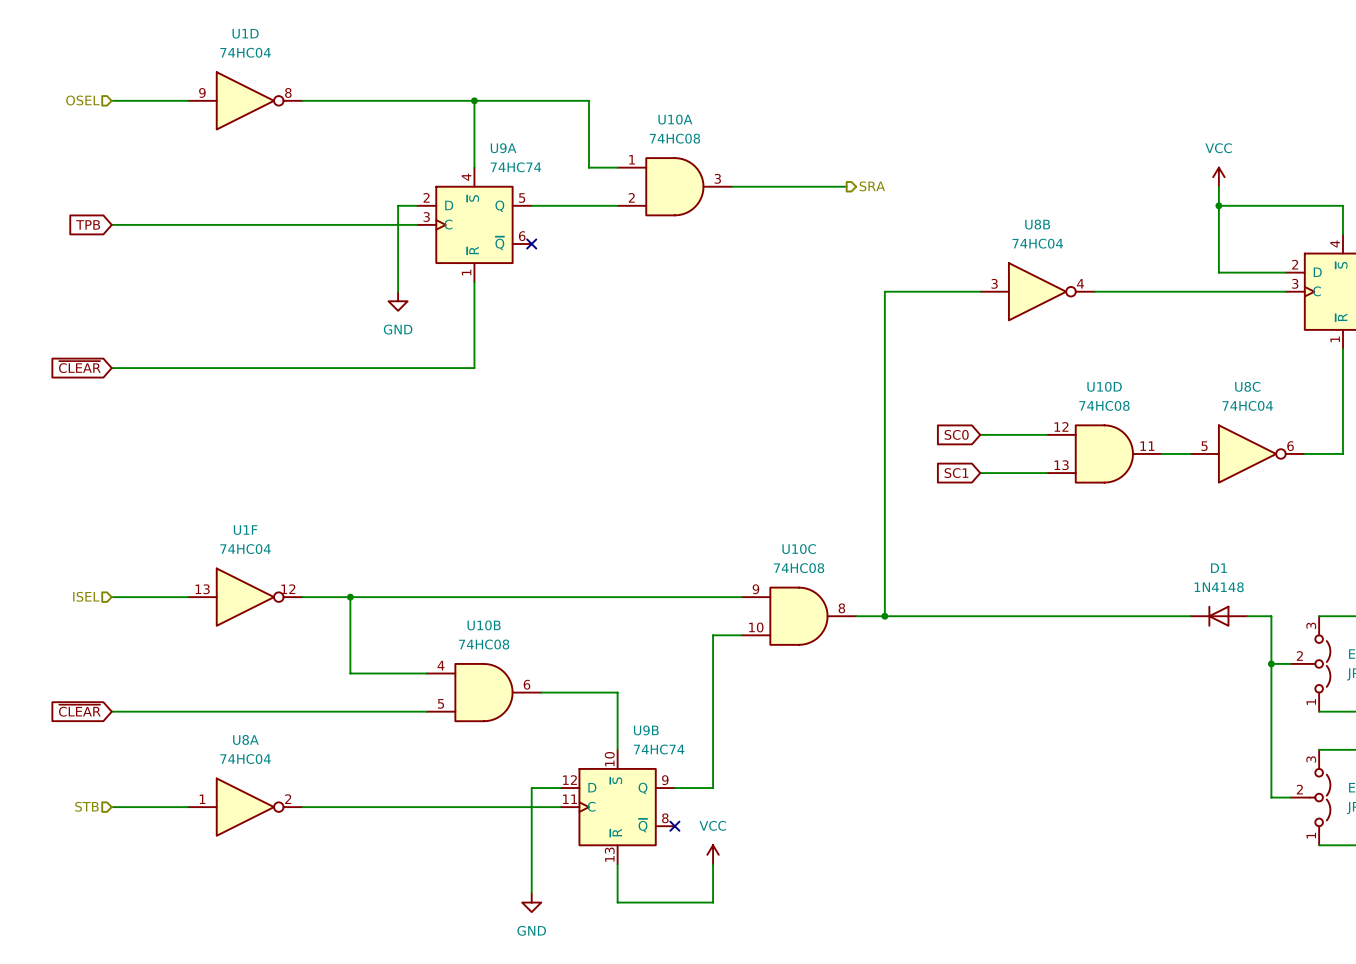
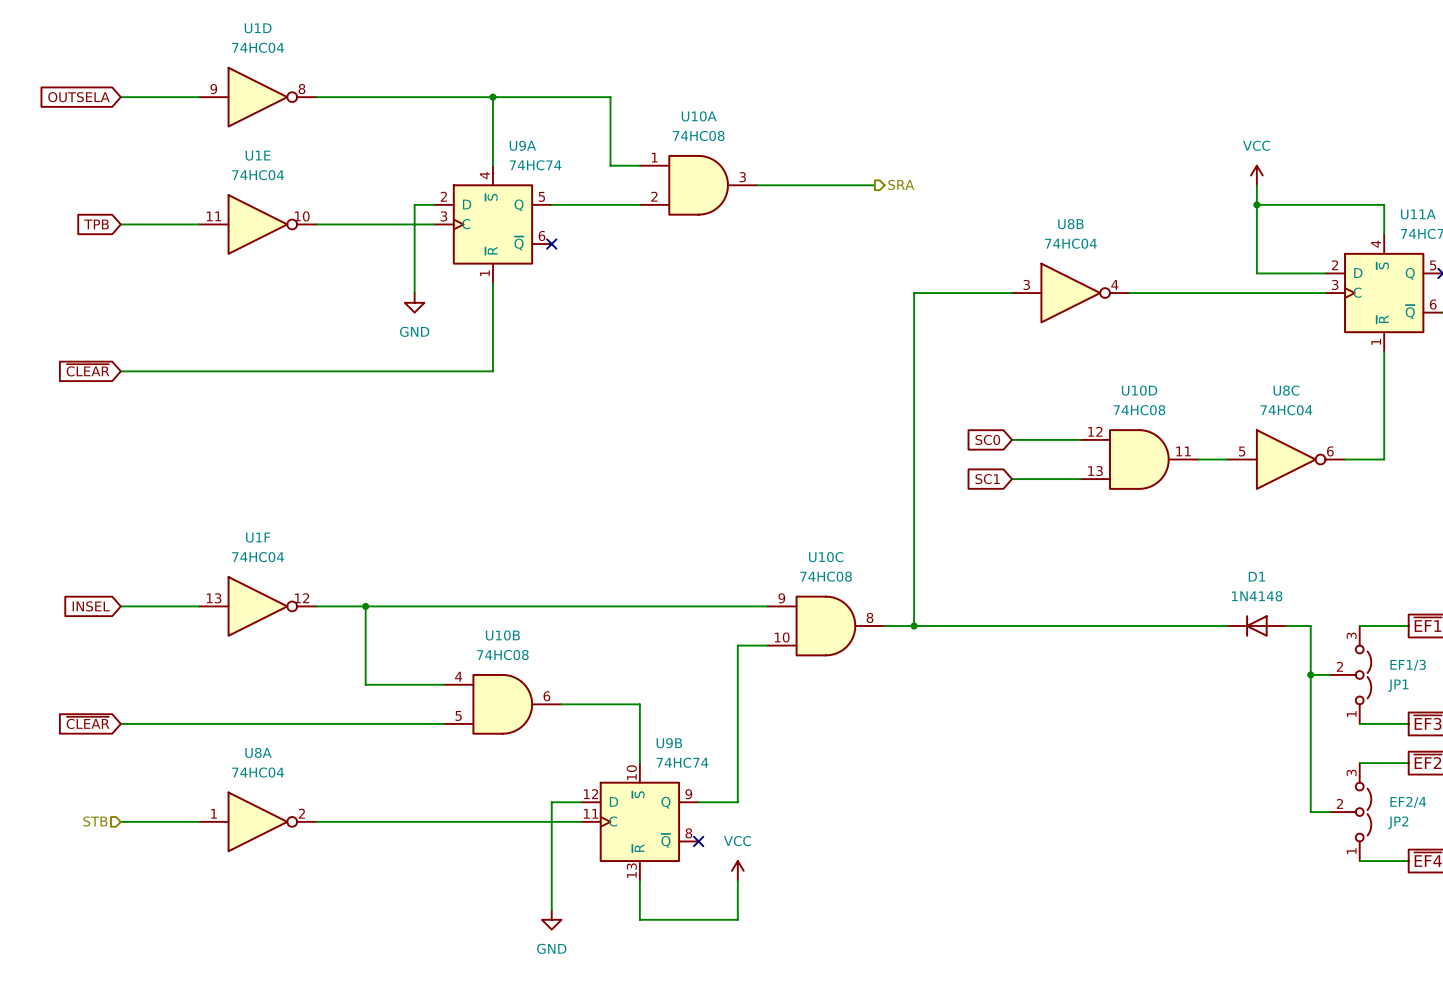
global label: none -> OUTSELA (78, 97)
hierarchical label: OSEL (82, 100) -> none
U1E: none -> 74HC04 (257, 224)
hierarchical label: ISEL (86, 596) -> none
global label: none -> INSEL (91, 606)

